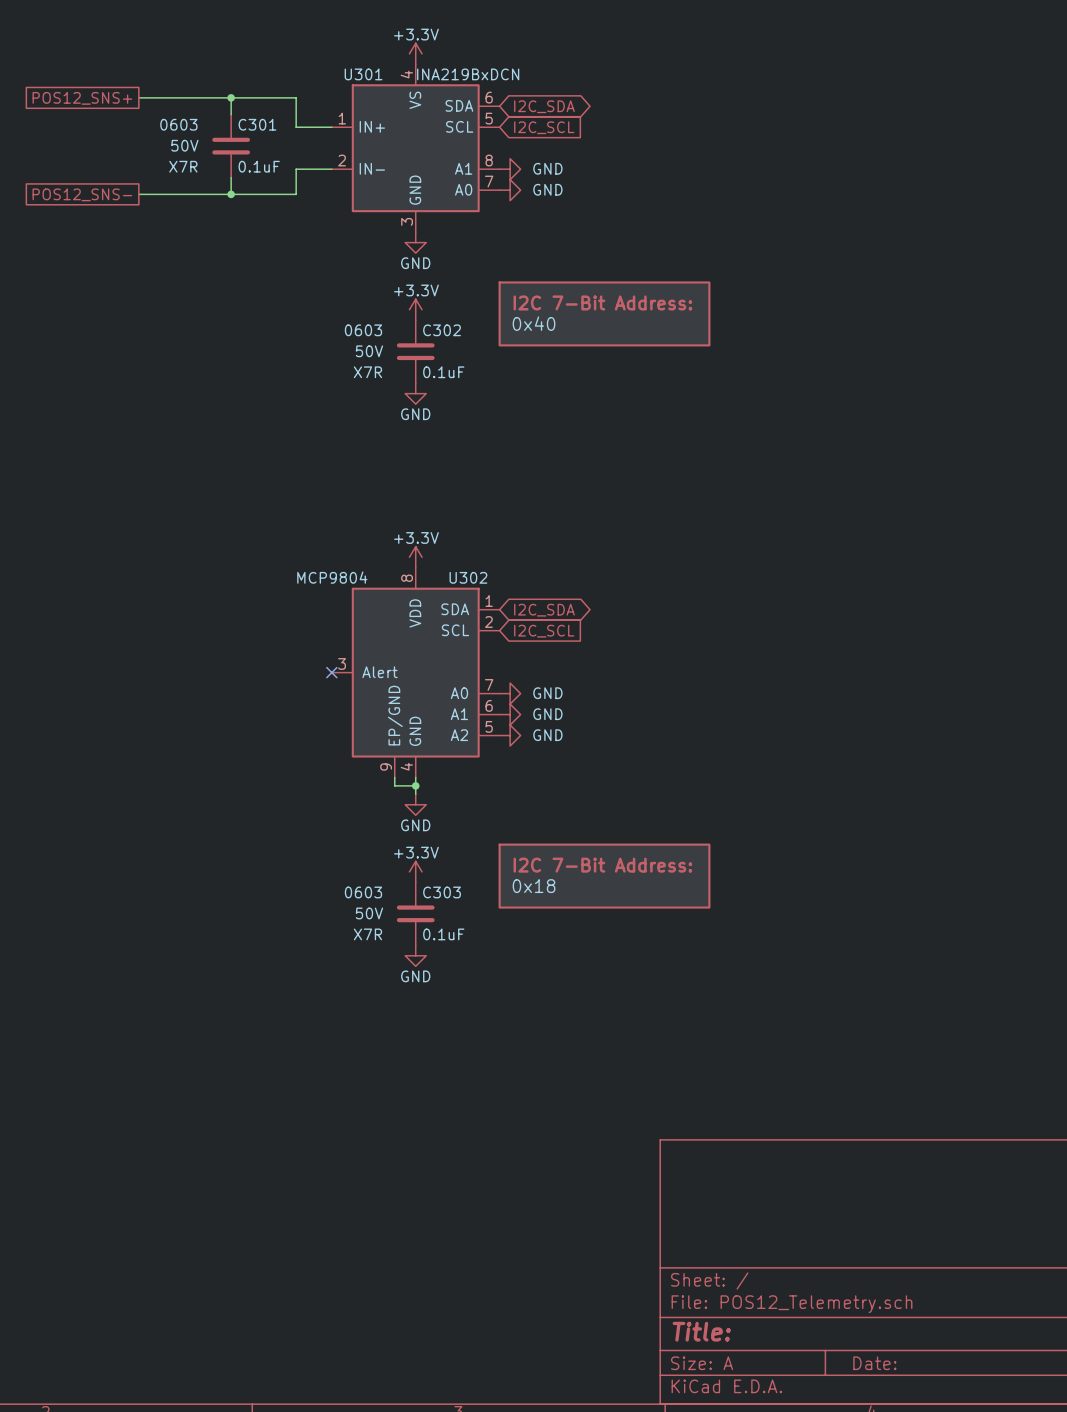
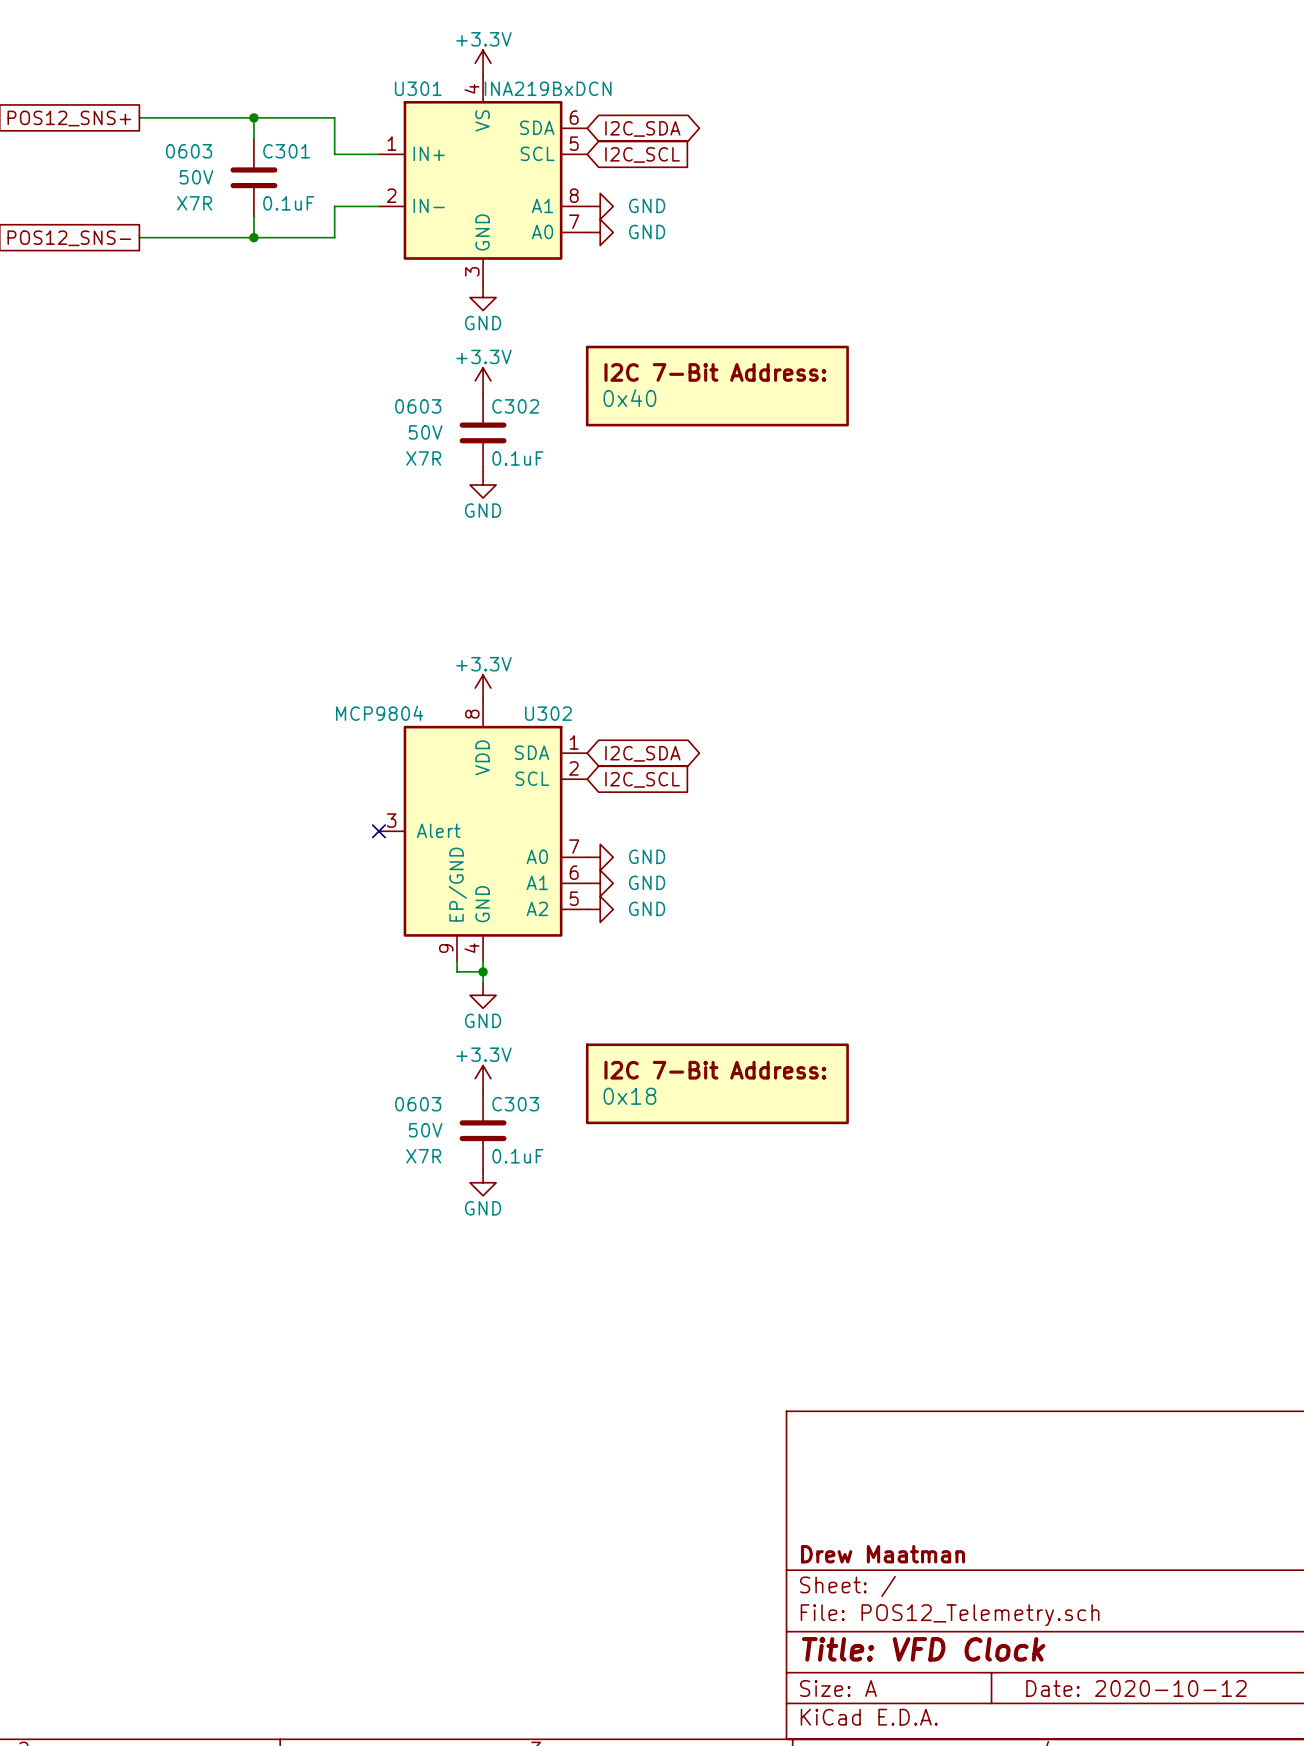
title block: none -> Drew Maatman (883, 1554)
title block: Title: (701, 1331) -> Title: VFD Clock (923, 1649)
title block: Date: (874, 1363) -> Date: 2020-10-12 (1136, 1688)

